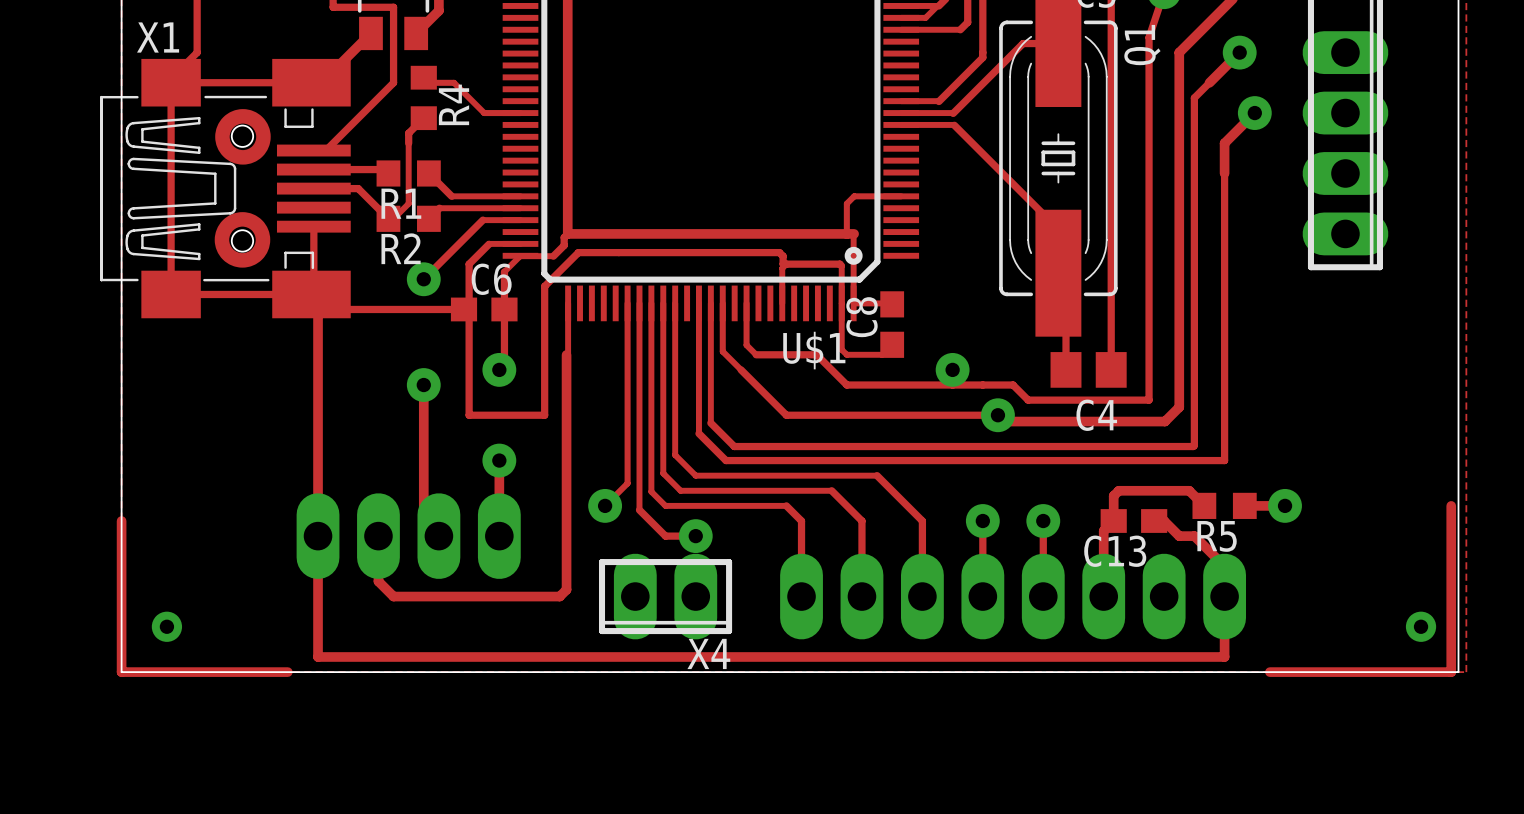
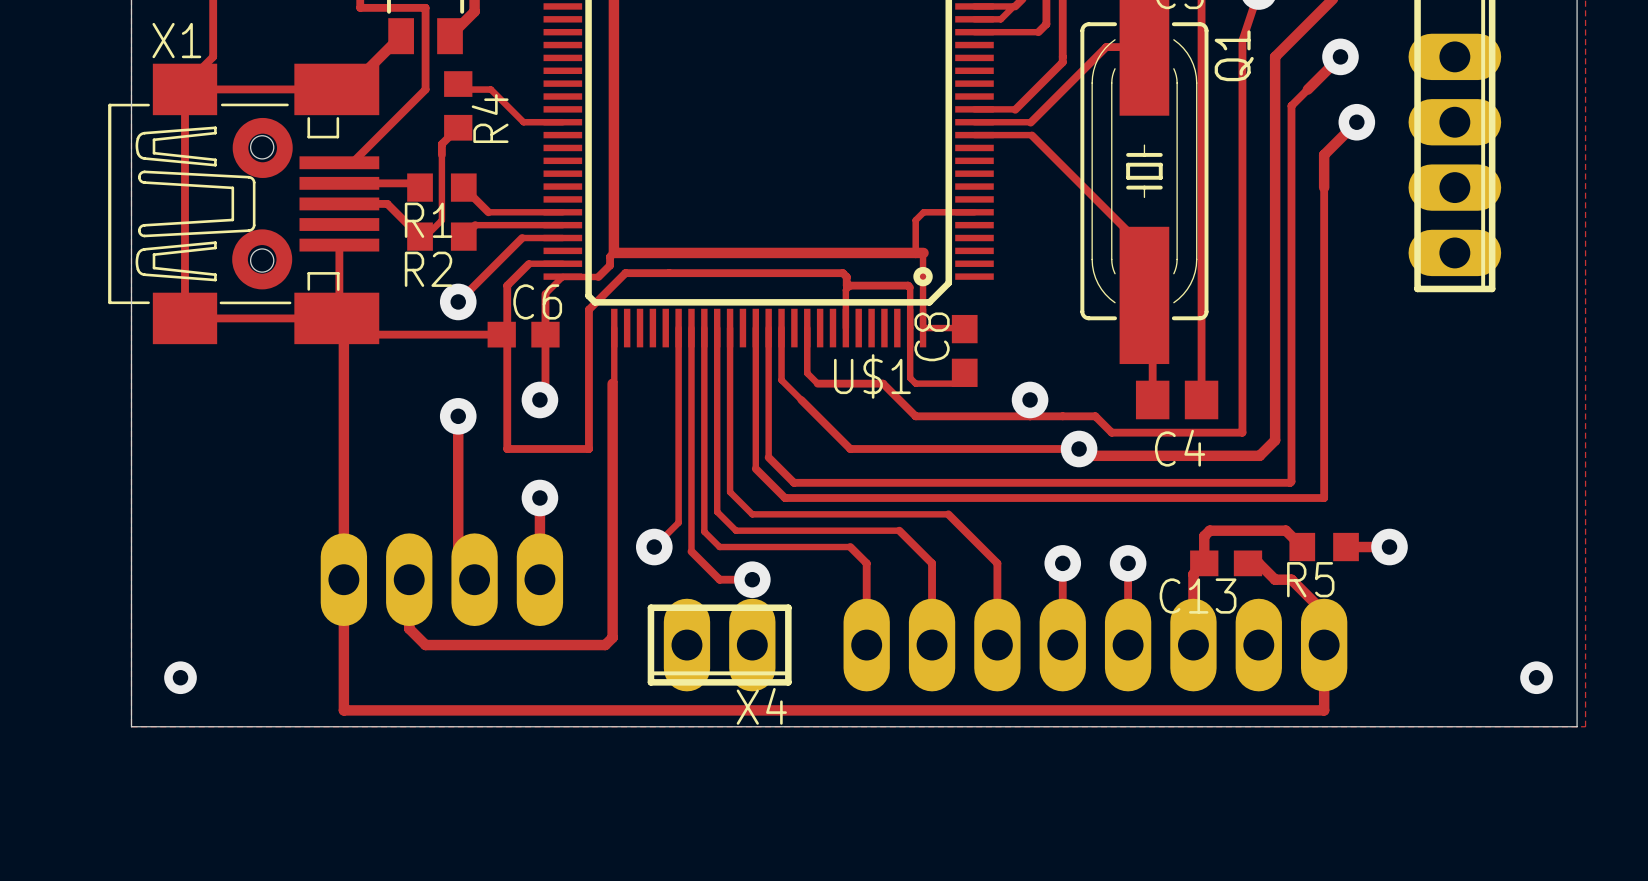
track: (1451, 505) (1451, 672) (1269, 672) -> none
track: (121, 521) (121, 672) (287, 672) -> none

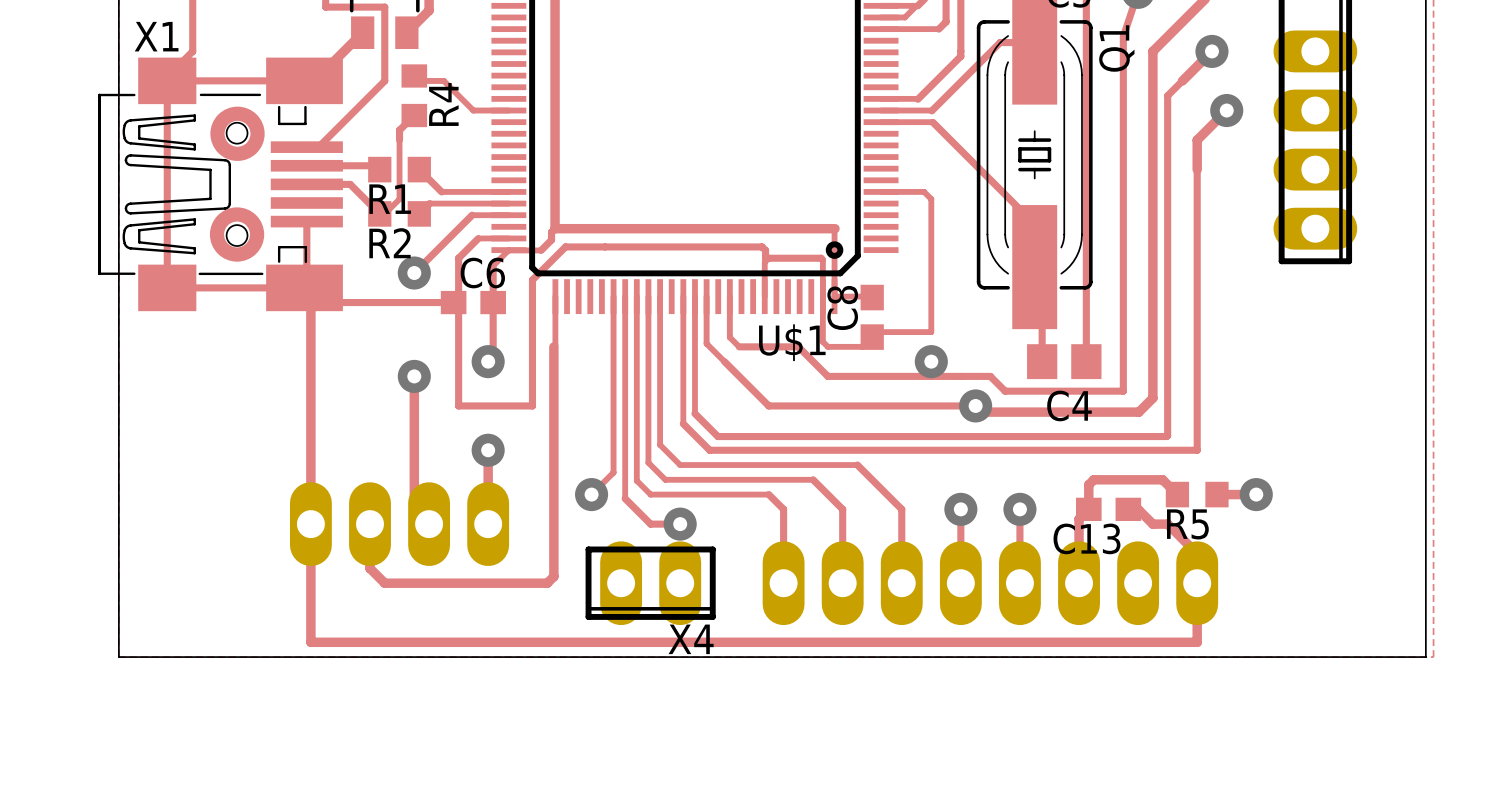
track: (974, 212) (923, 212) (915, 220) (915, 252) -> (881, 191) (924, 191) (931, 199) (931, 332) (877, 332) (872, 337)
via: (180, 677) -> none
via: (1536, 677) -> none

